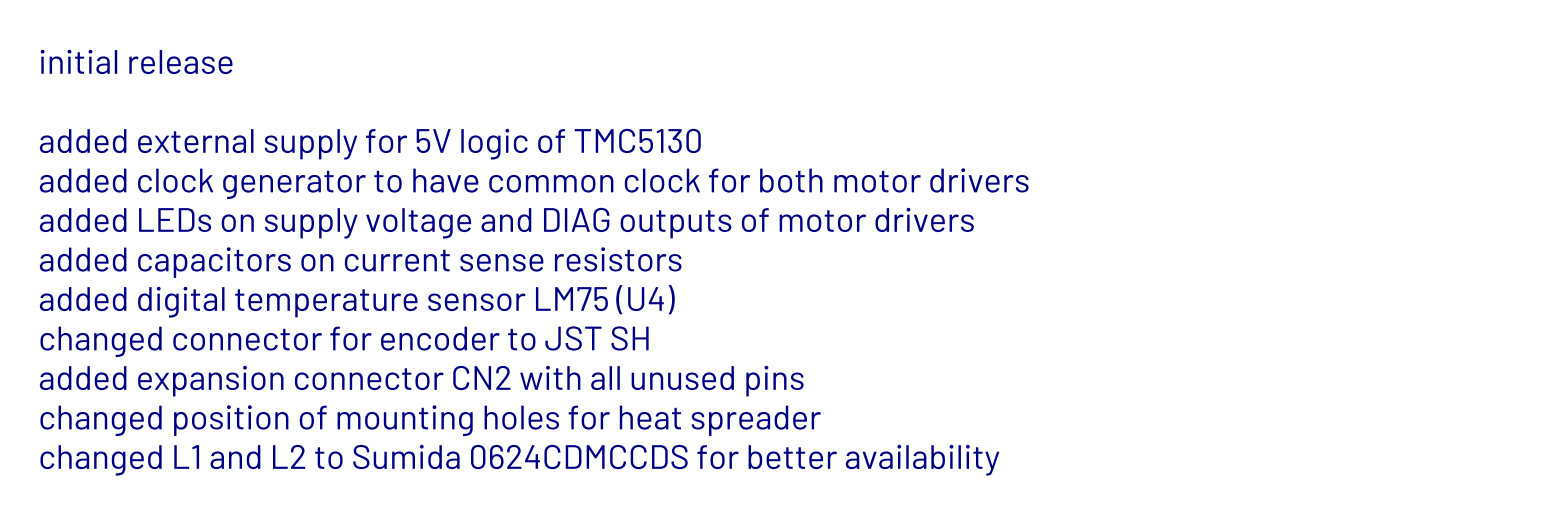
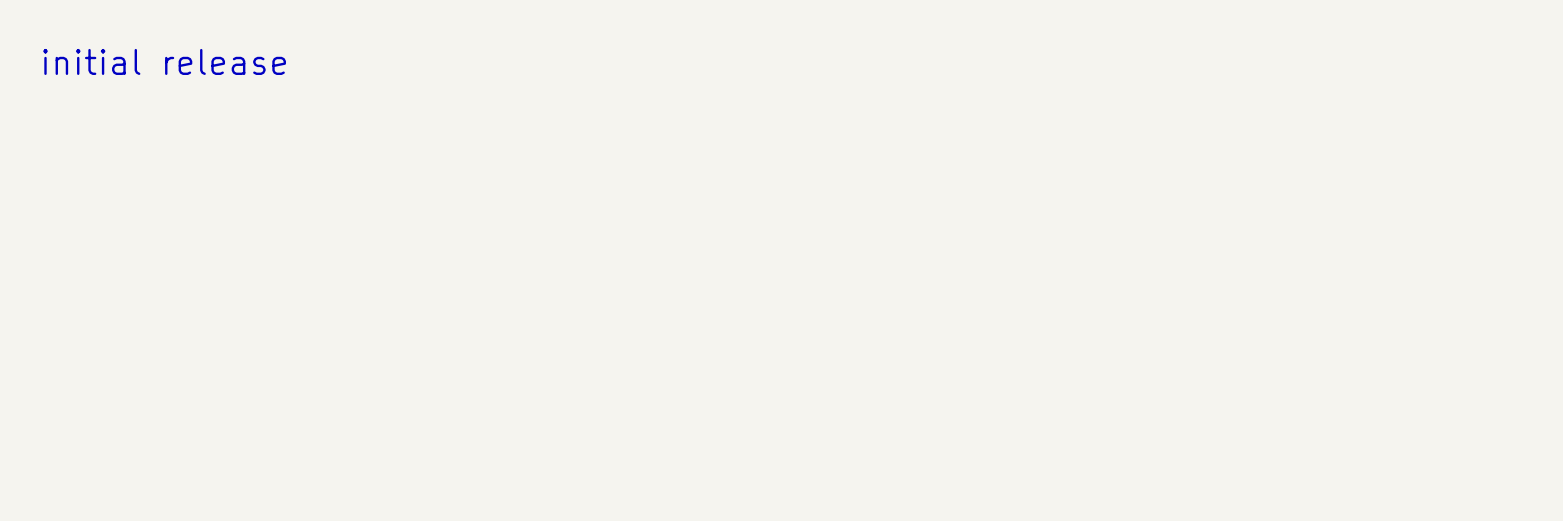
text: added external supply for 5V logic of TMC5130 (370, 144) -> none
text: added clock generator to have common clock for both motor drivers (534, 183) -> none
text: added LEDs on supply voltage and DIAG outputs of motor drivers (506, 223) -> none
text: added capacitors on current sense resistors (360, 262) -> none
text: added digital temperature sensor LM75 (U4) (357, 301) -> none
text: changed connector for encoder to JST SH (344, 341) -> none
text: added expansion connector CN2 with all unused pins (421, 381) -> none
text: changed position of mounting holes for heat spreader (430, 420) -> none
text: changed L1 and L2 to Sumida 0624CDMCCDS for better availability (519, 460) -> none

